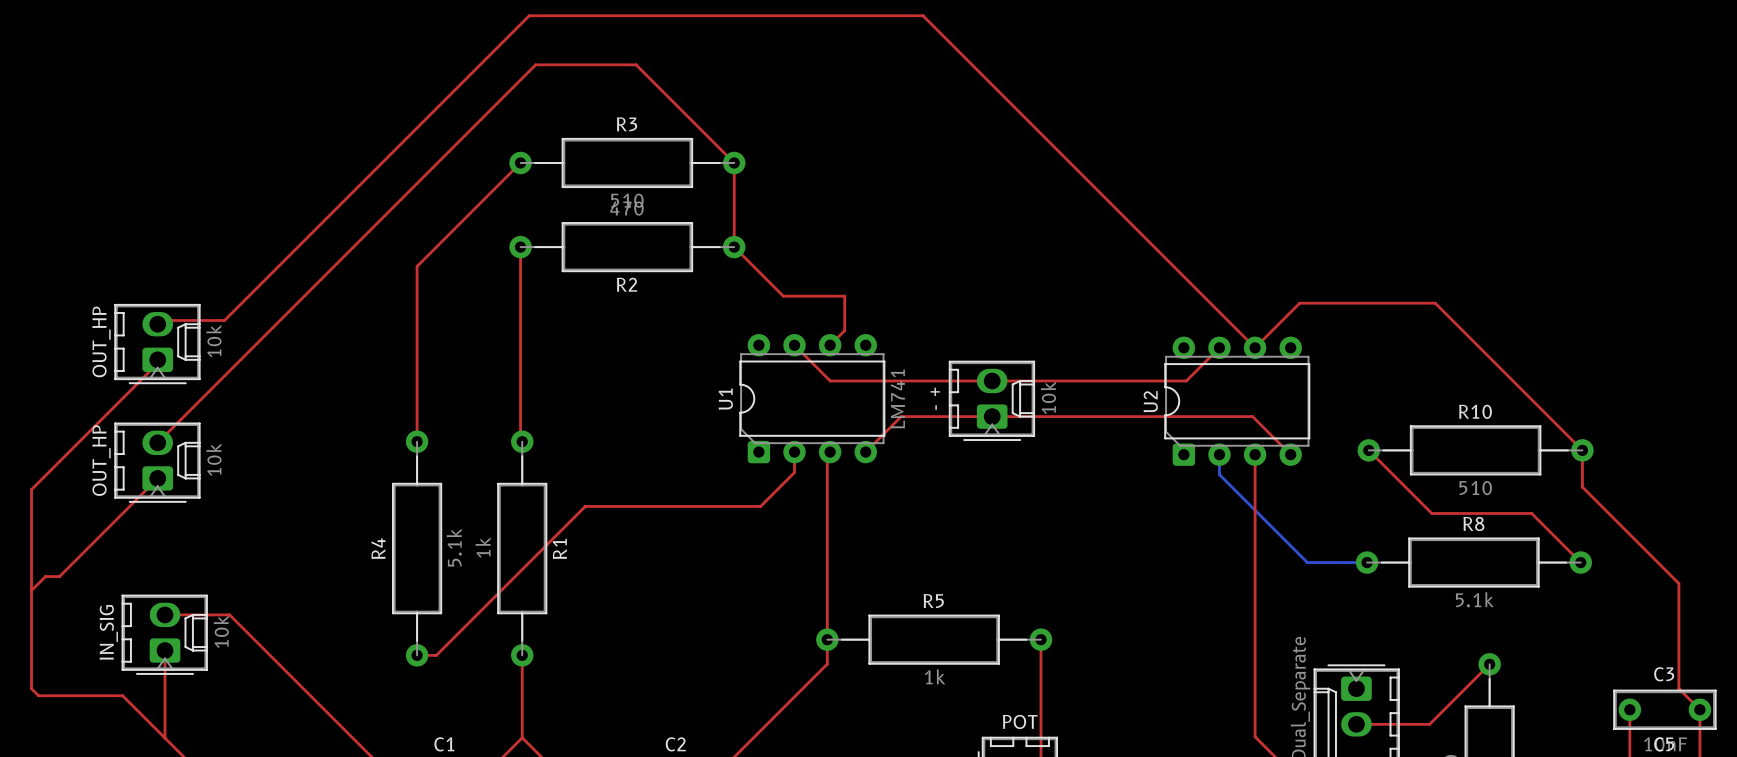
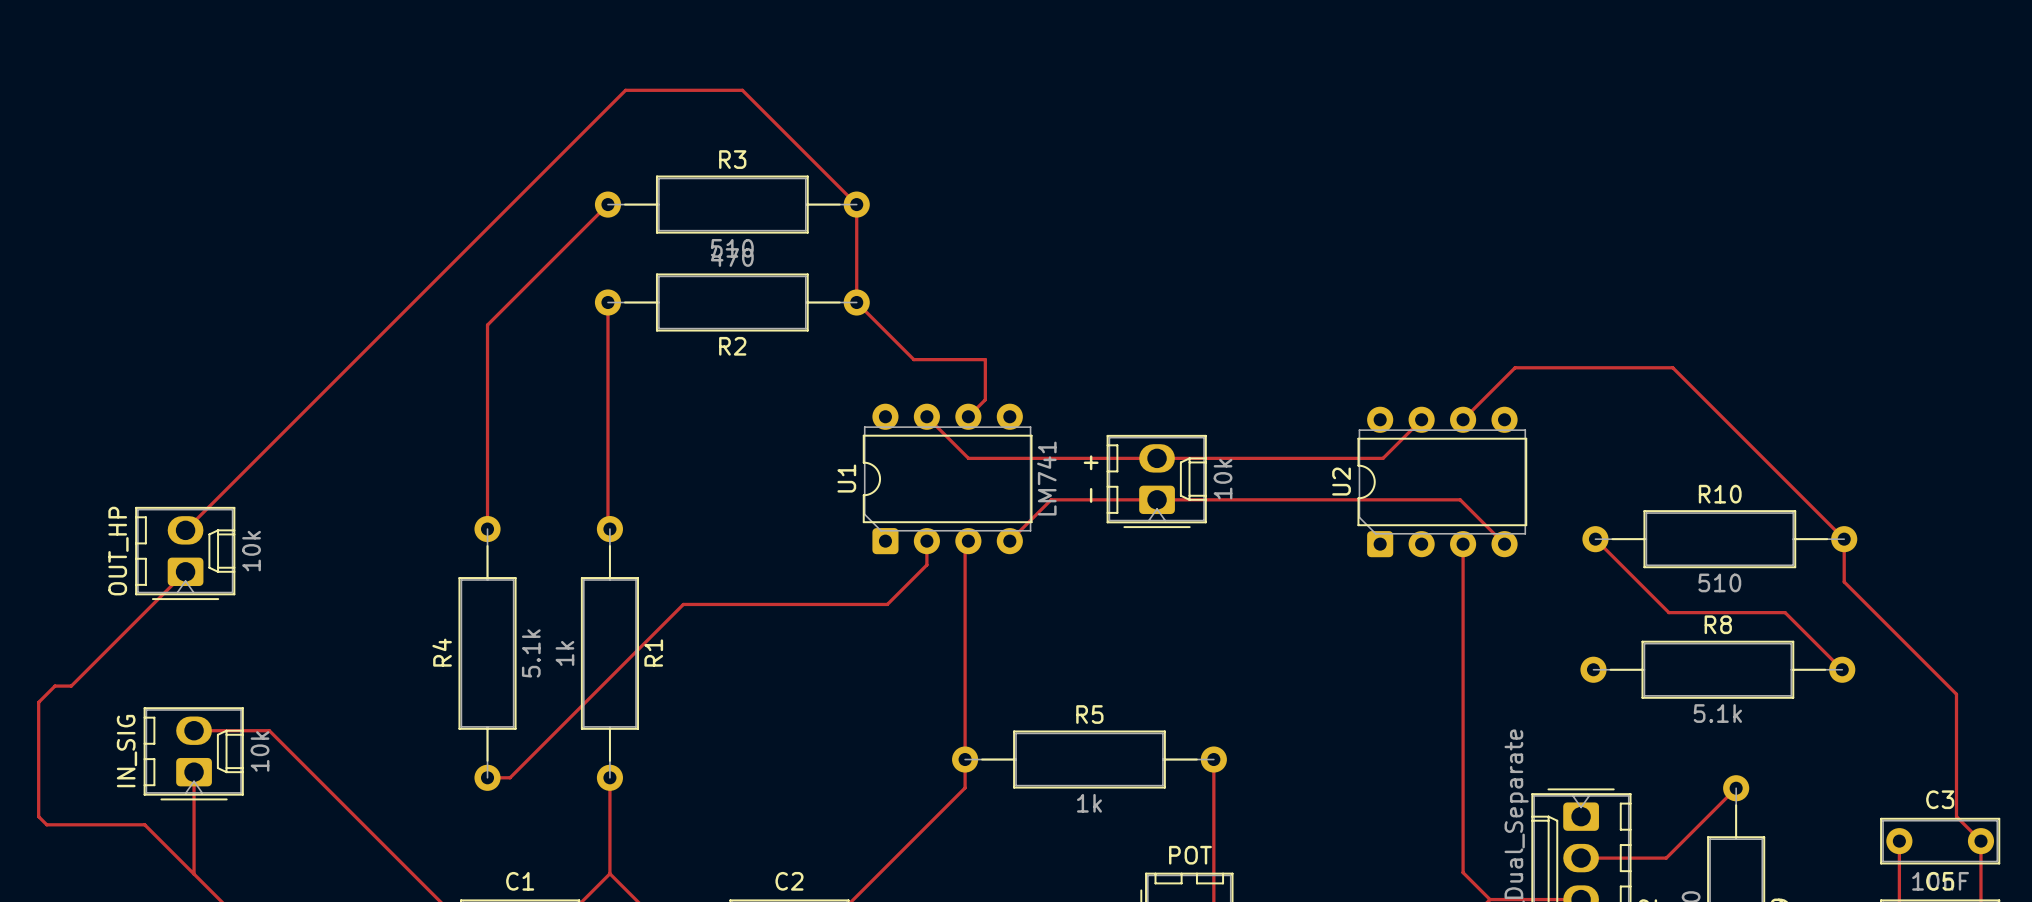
top track: (165, 320) (224, 320) (529, 15) (923, 15) (1255, 347) -> none
OUT_HP: 10k (157, 344) -> none
top track: (165, 356) (31, 489) (31, 590) -> none
bottom track: (1219, 454) (1219, 474) (1307, 562) (1367, 562) -> none

